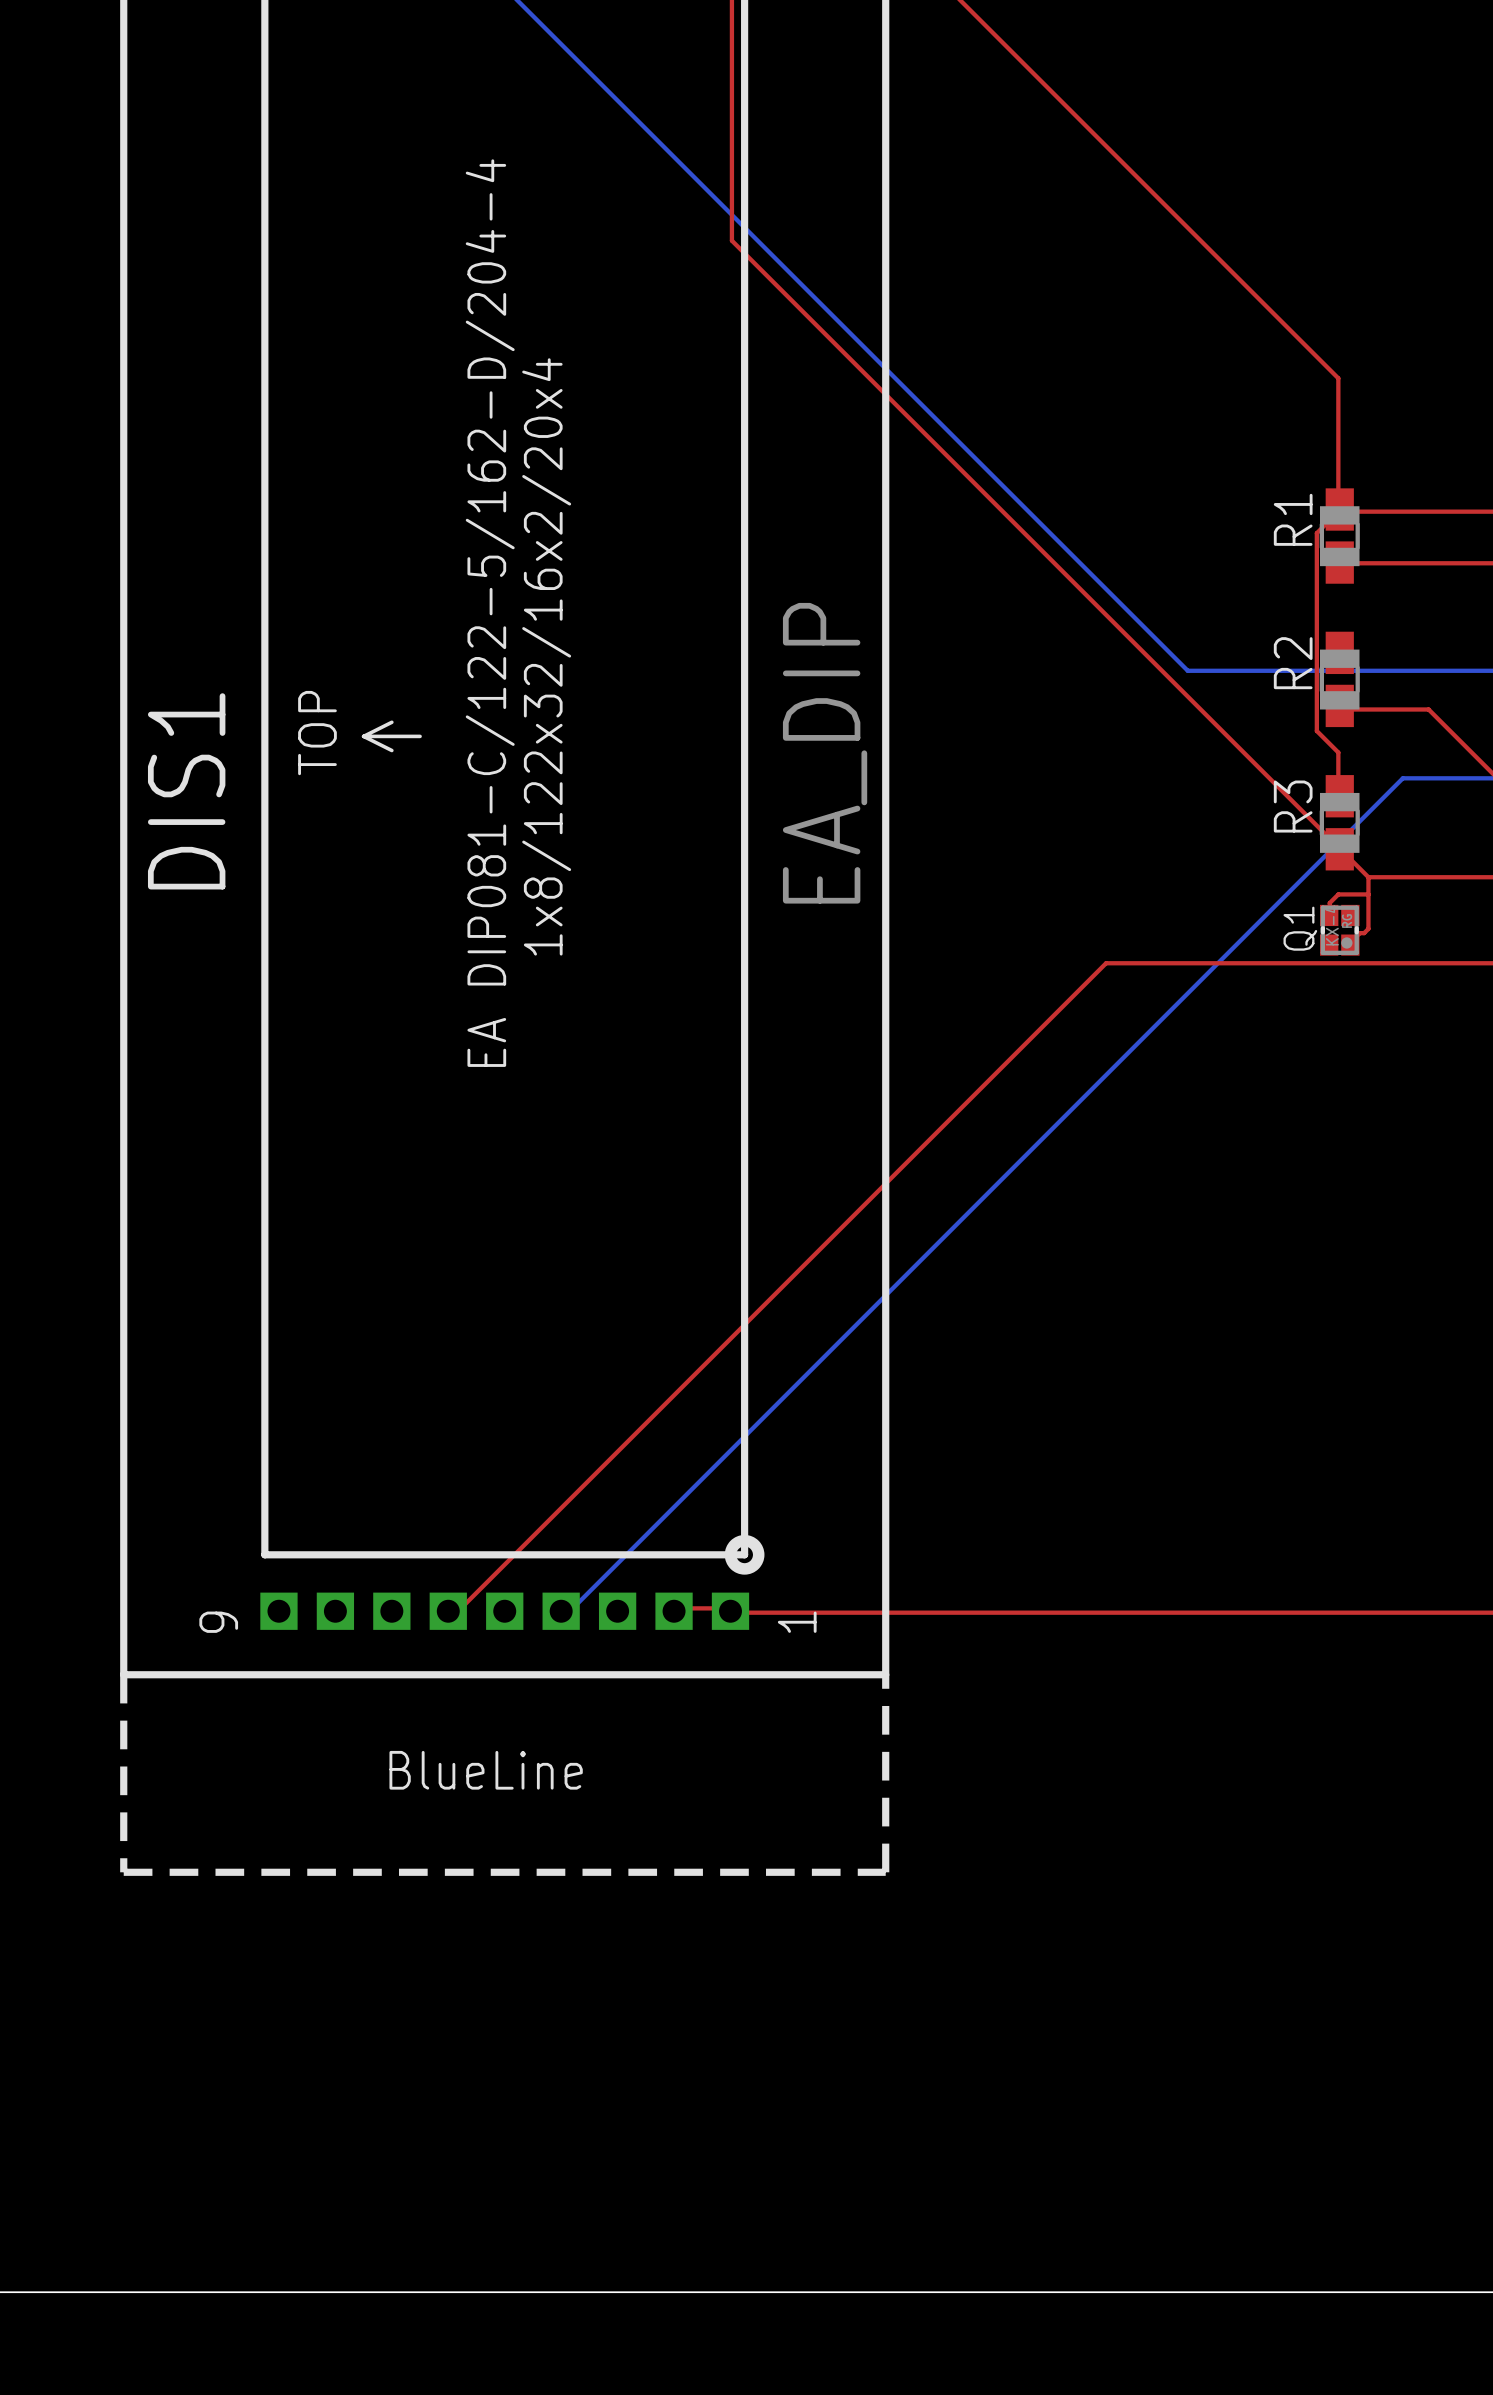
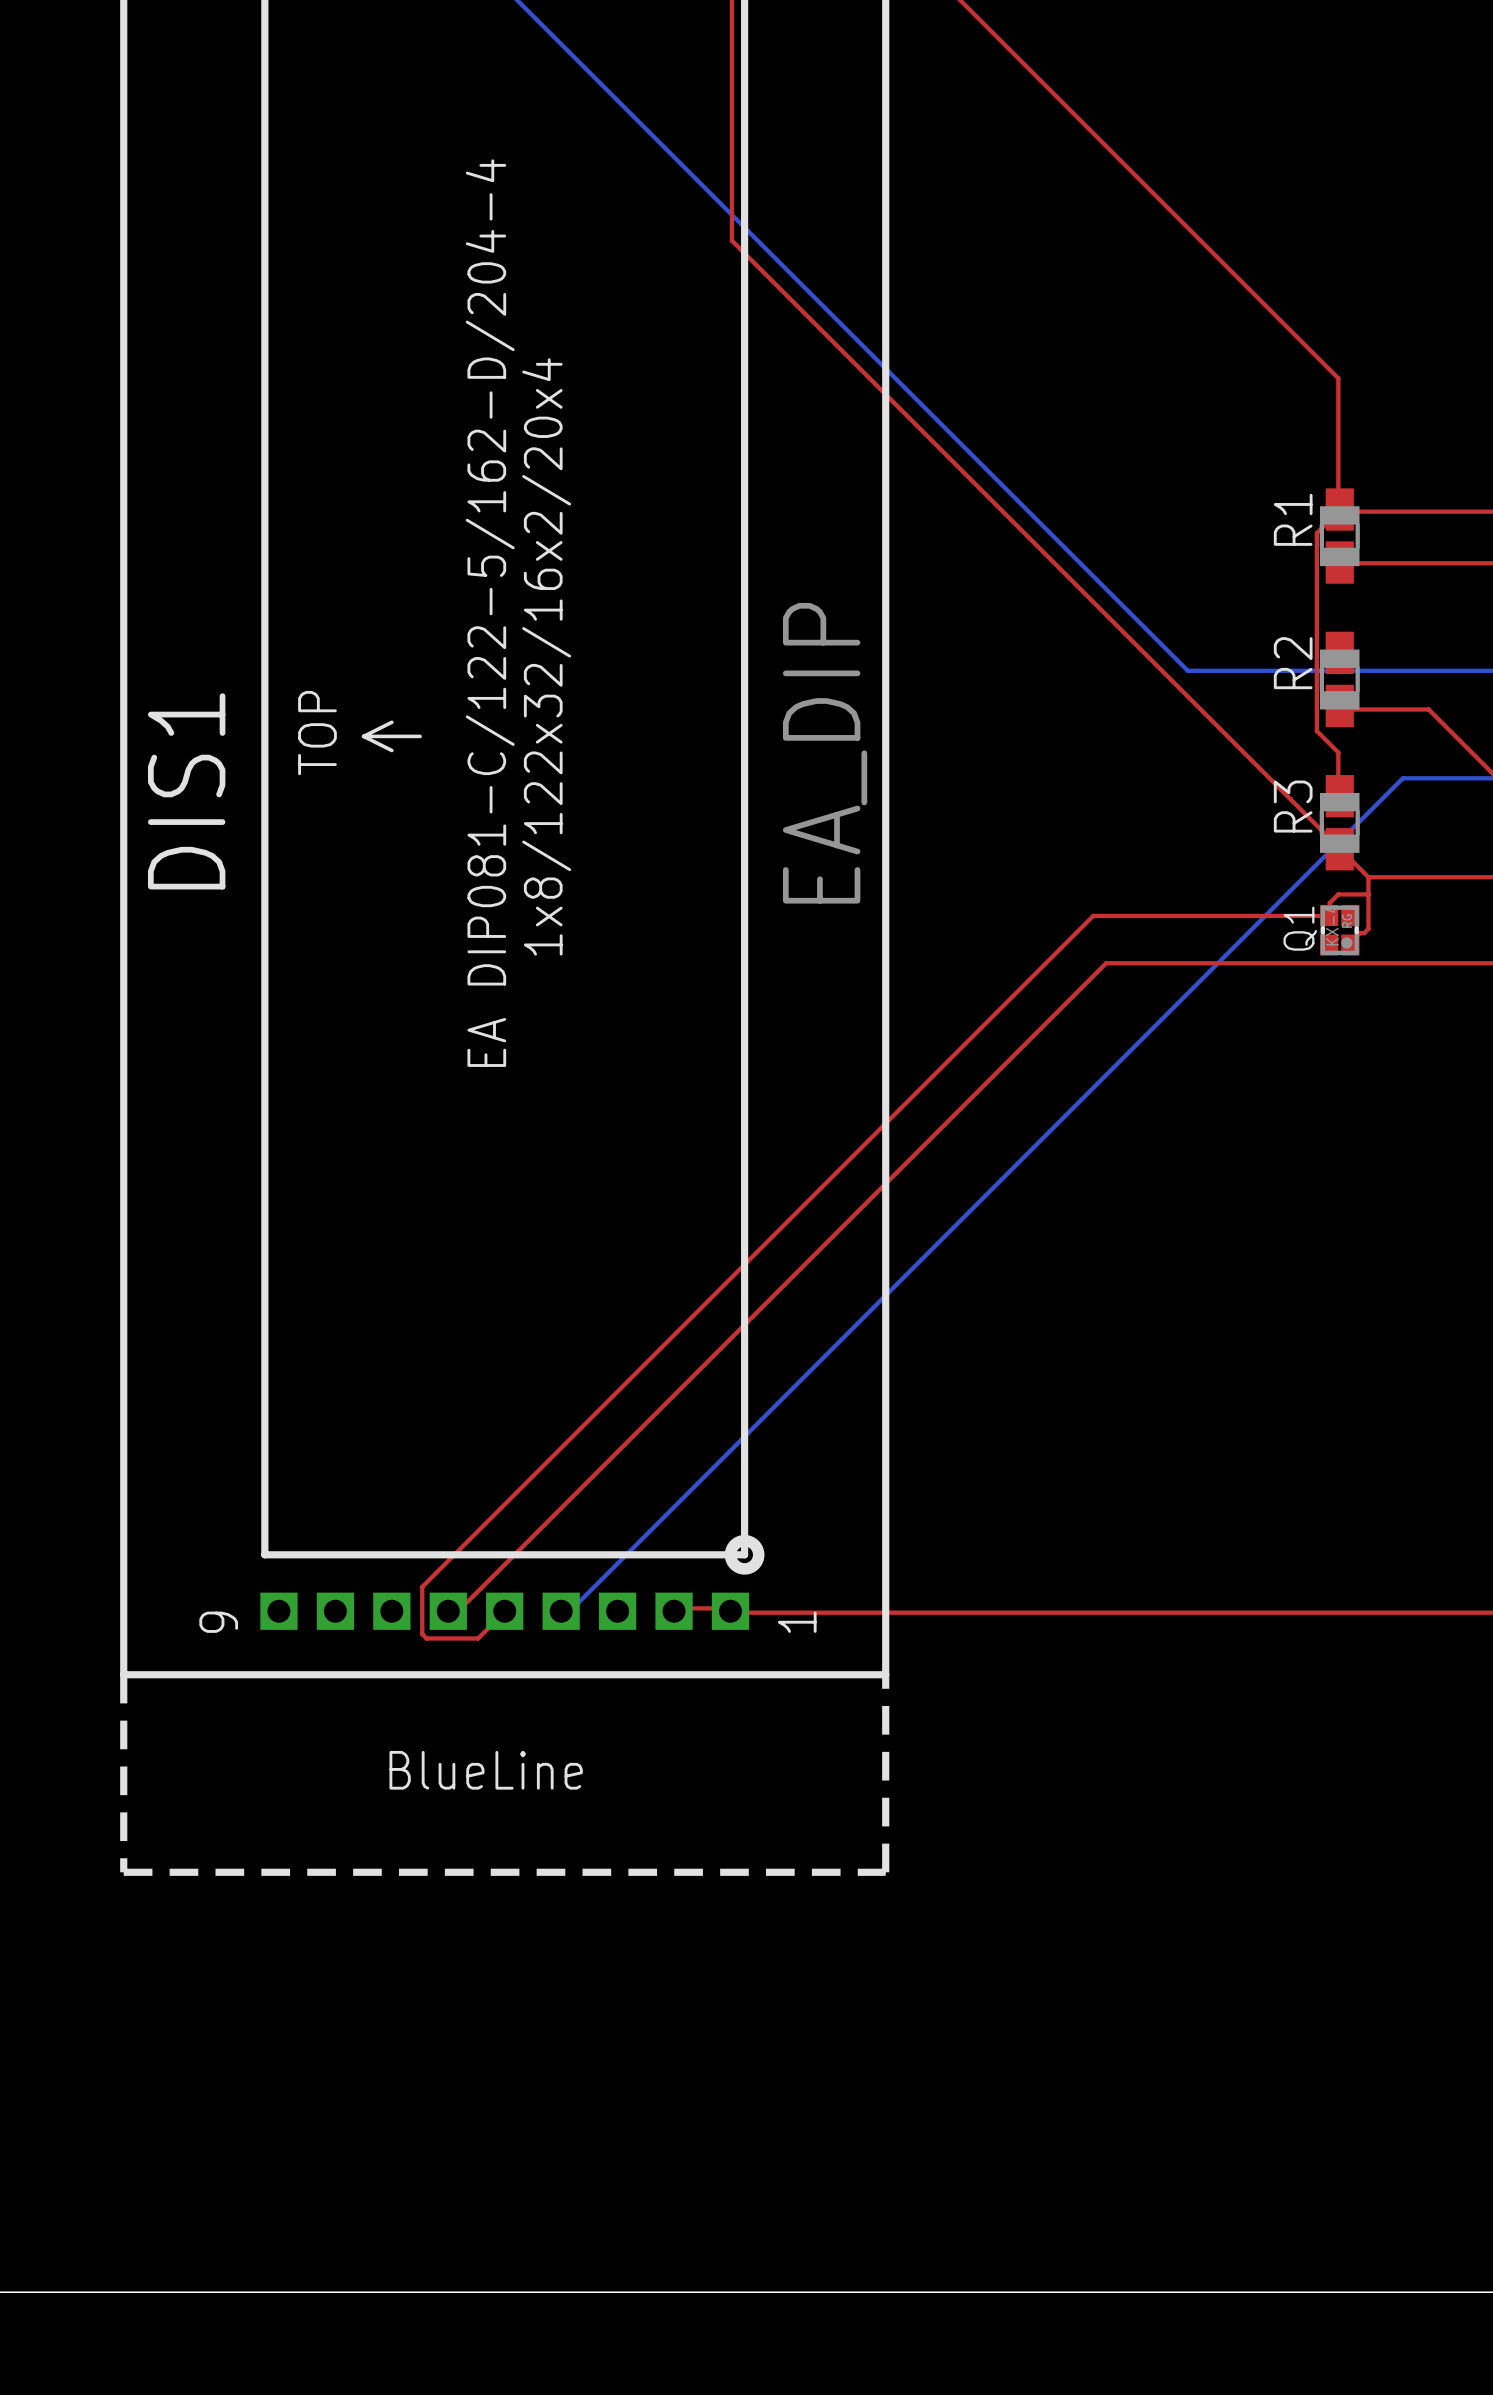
top track: none -> (1329, 915) (1093, 915) (422, 1586) (422, 1634) (426, 1638) (478, 1638) (504, 1611)

